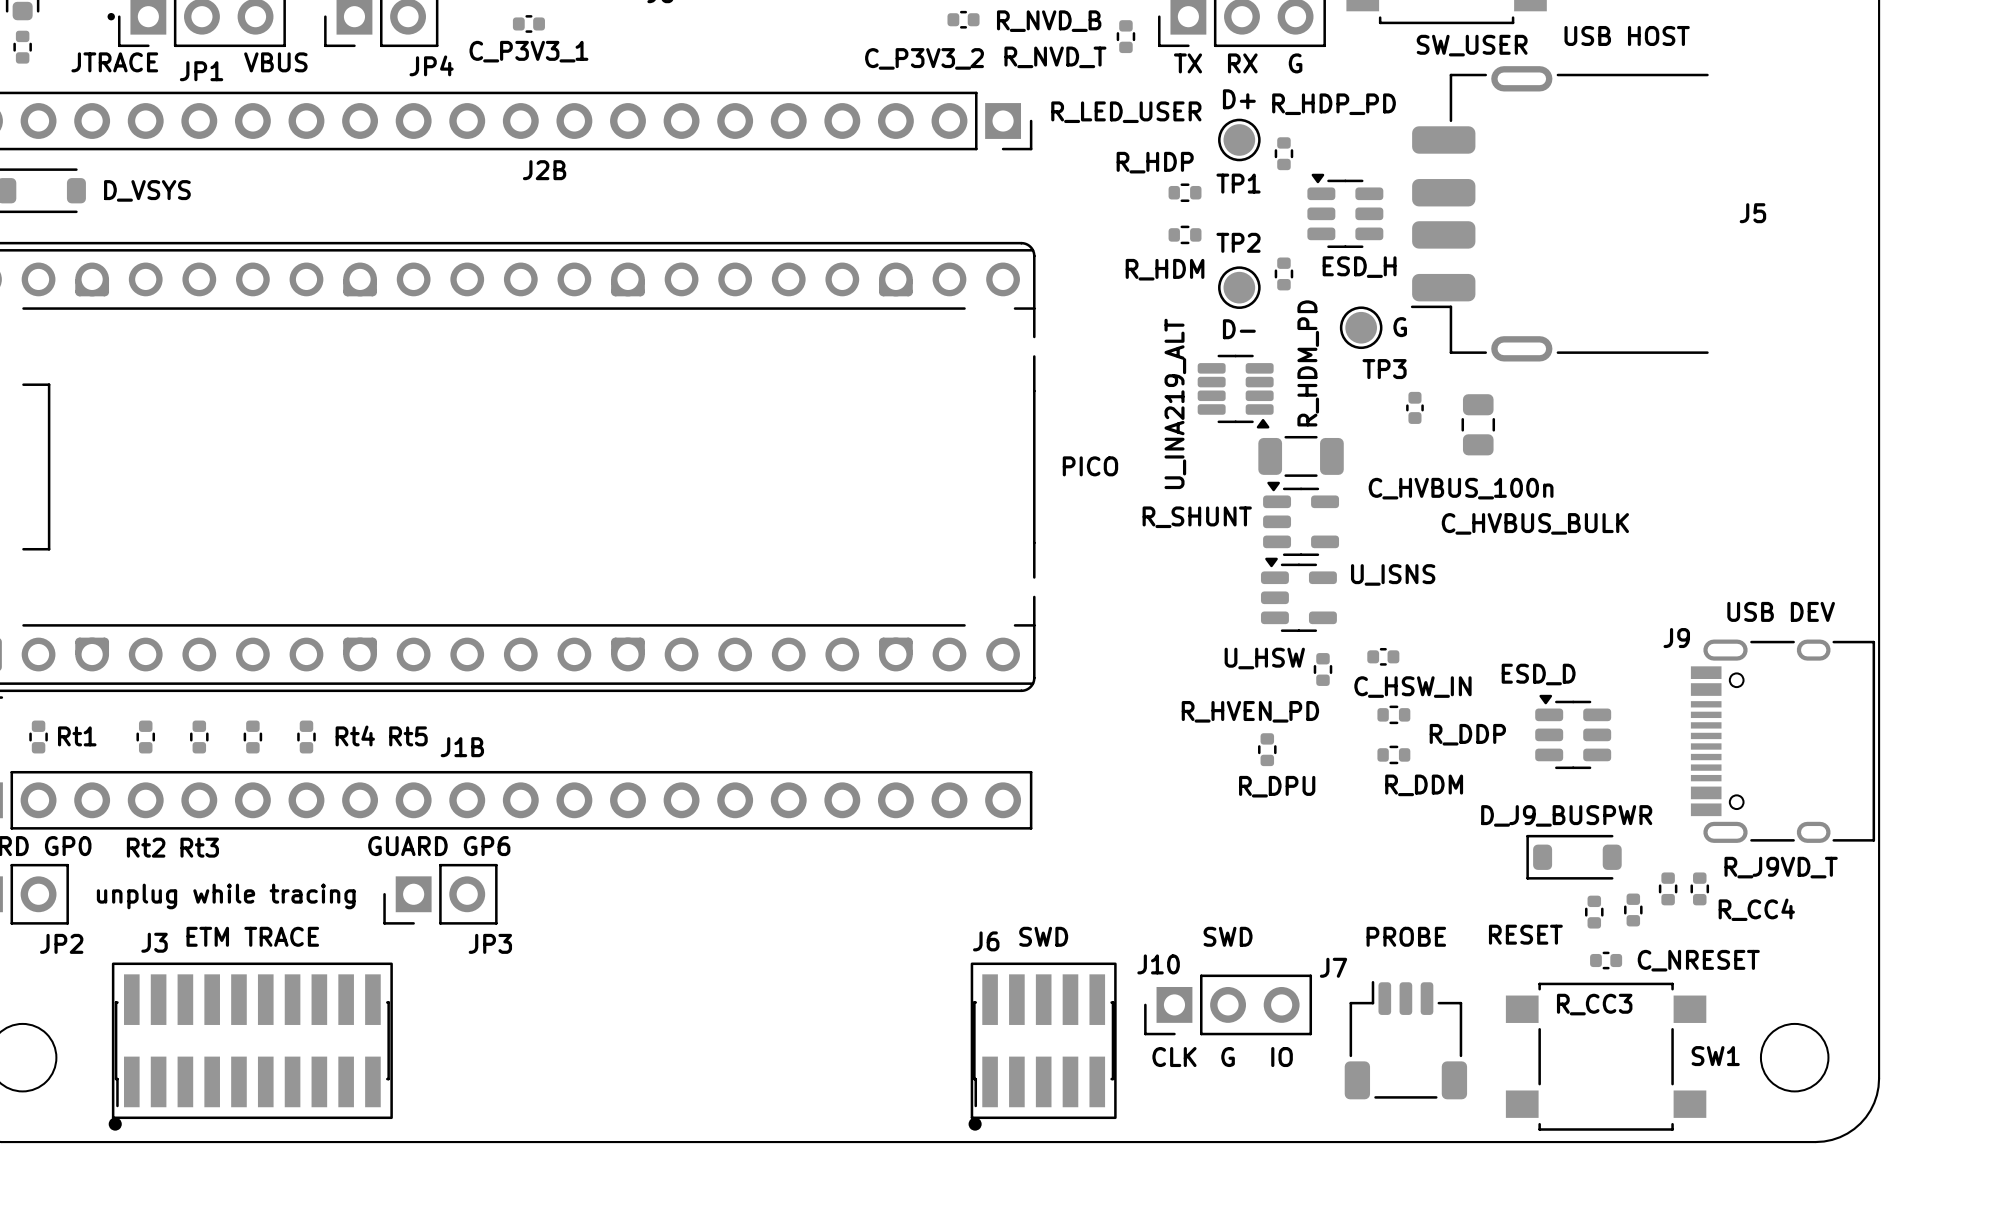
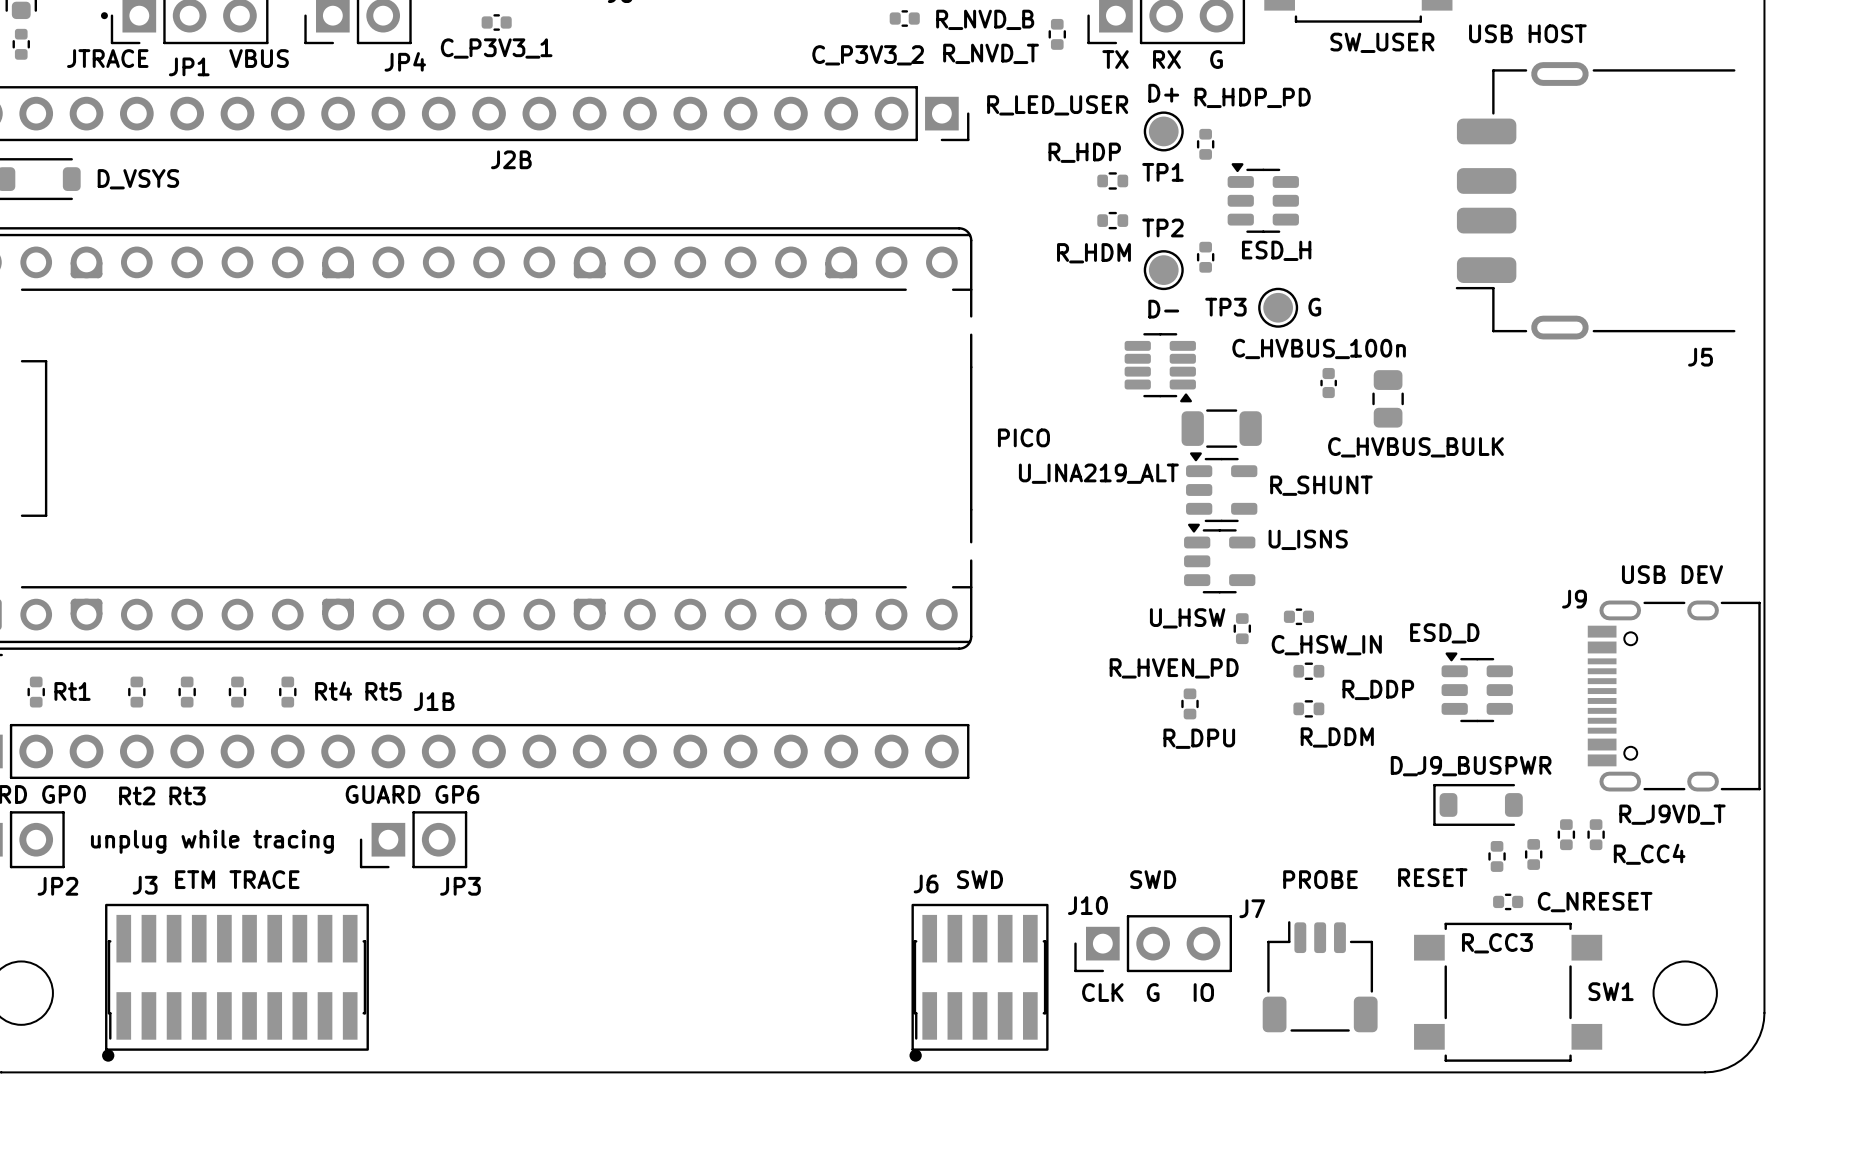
J5 position: (1559, 213) -> (1595, 200)
J5 name position: J5 (1752, 213) -> J5 (1700, 357)
R_HDM_PD name: R_HDM_PD (1308, 363) -> none
TP3 name position: TP3 (1384, 369) -> TP3 (1225, 307)
U_INA219_ALT name rotation: 0° (1175, 403) -> 90° clockwise (1098, 473)
C_HVBUS_100n name position: C_HVBUS_100n (1461, 488) -> C_HVBUS_100n (1319, 348)
R_SHUNT name position: R_SHUNT (1197, 517) -> R_SHUNT (1321, 485)
C_HVBUS_BULK name position: C_HVBUS_BULK (1535, 523) -> C_HVBUS_BULK (1415, 447)

